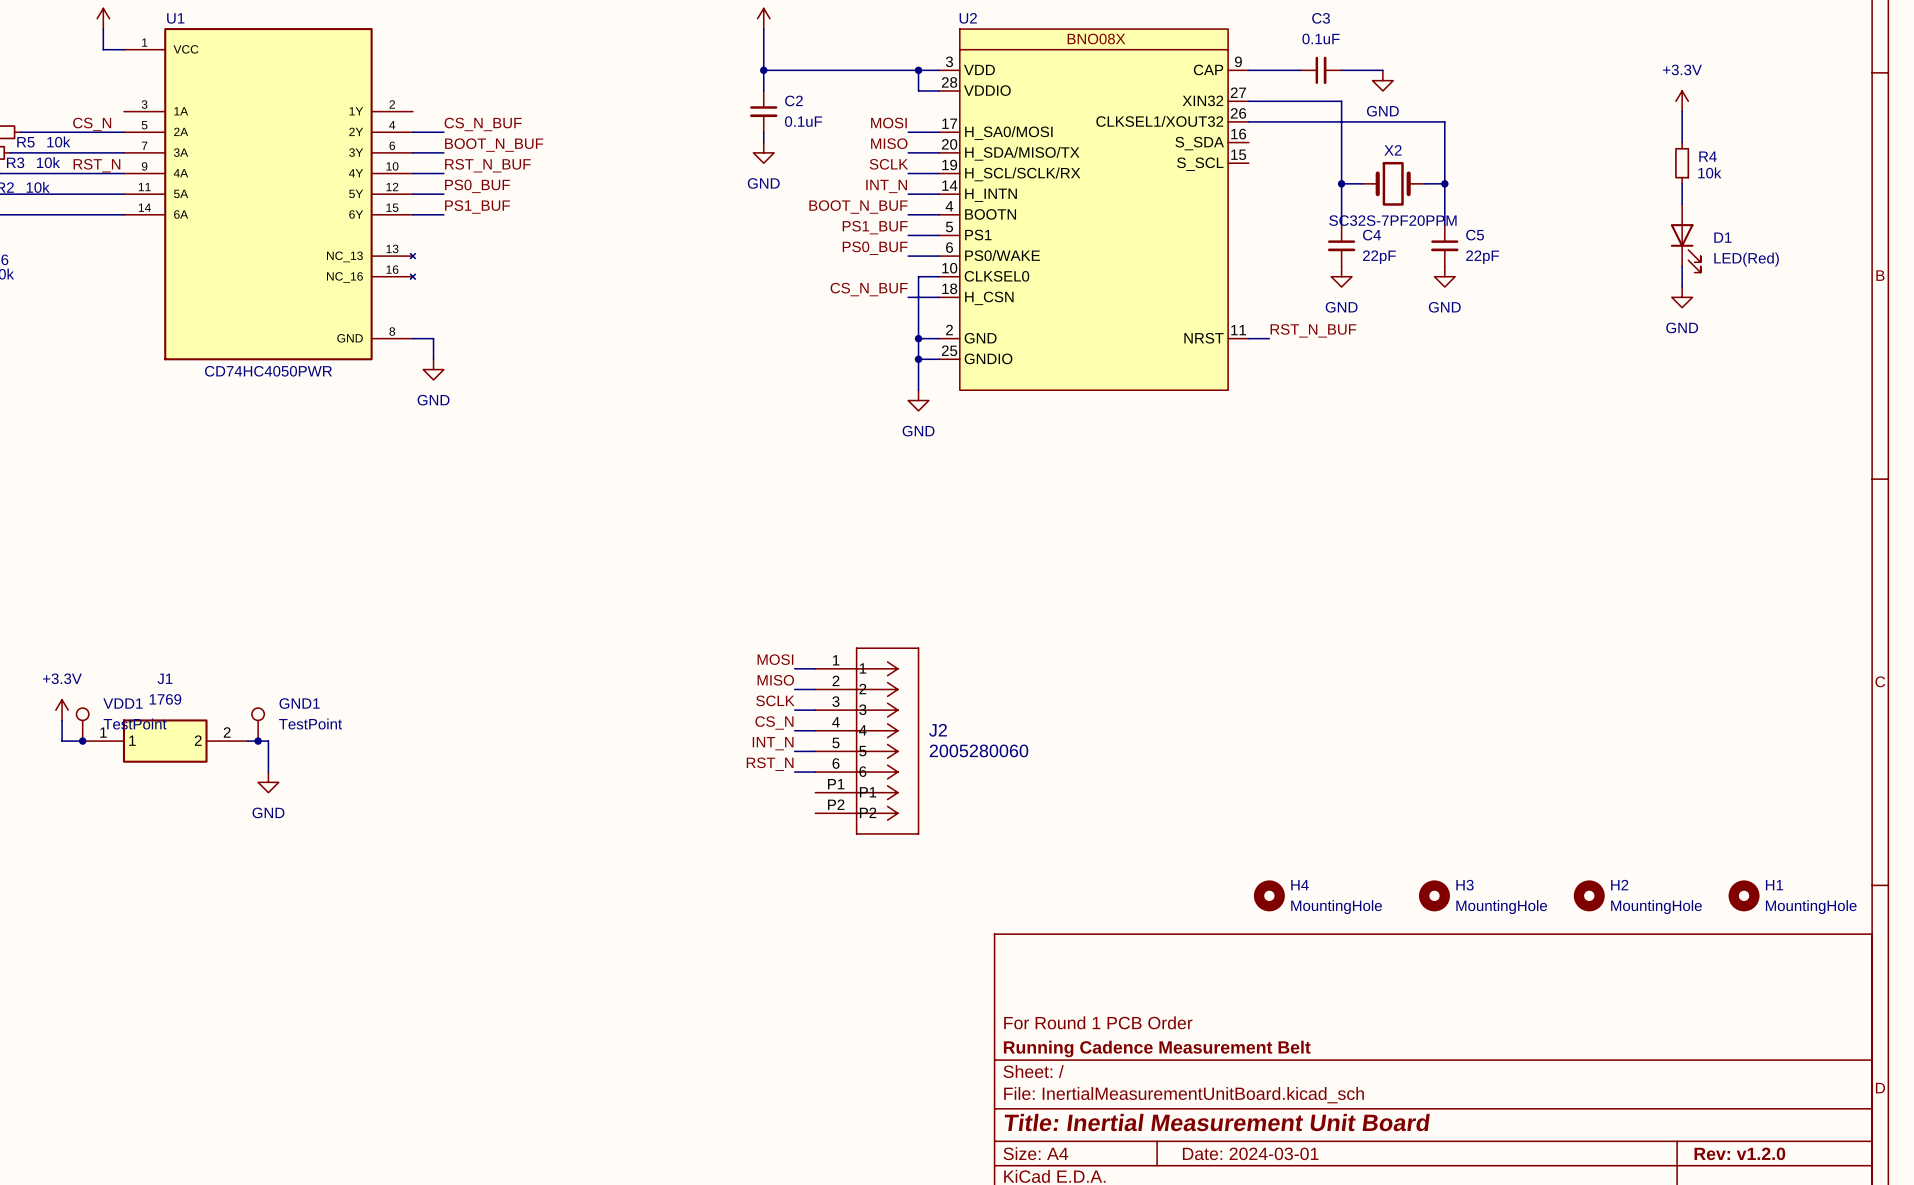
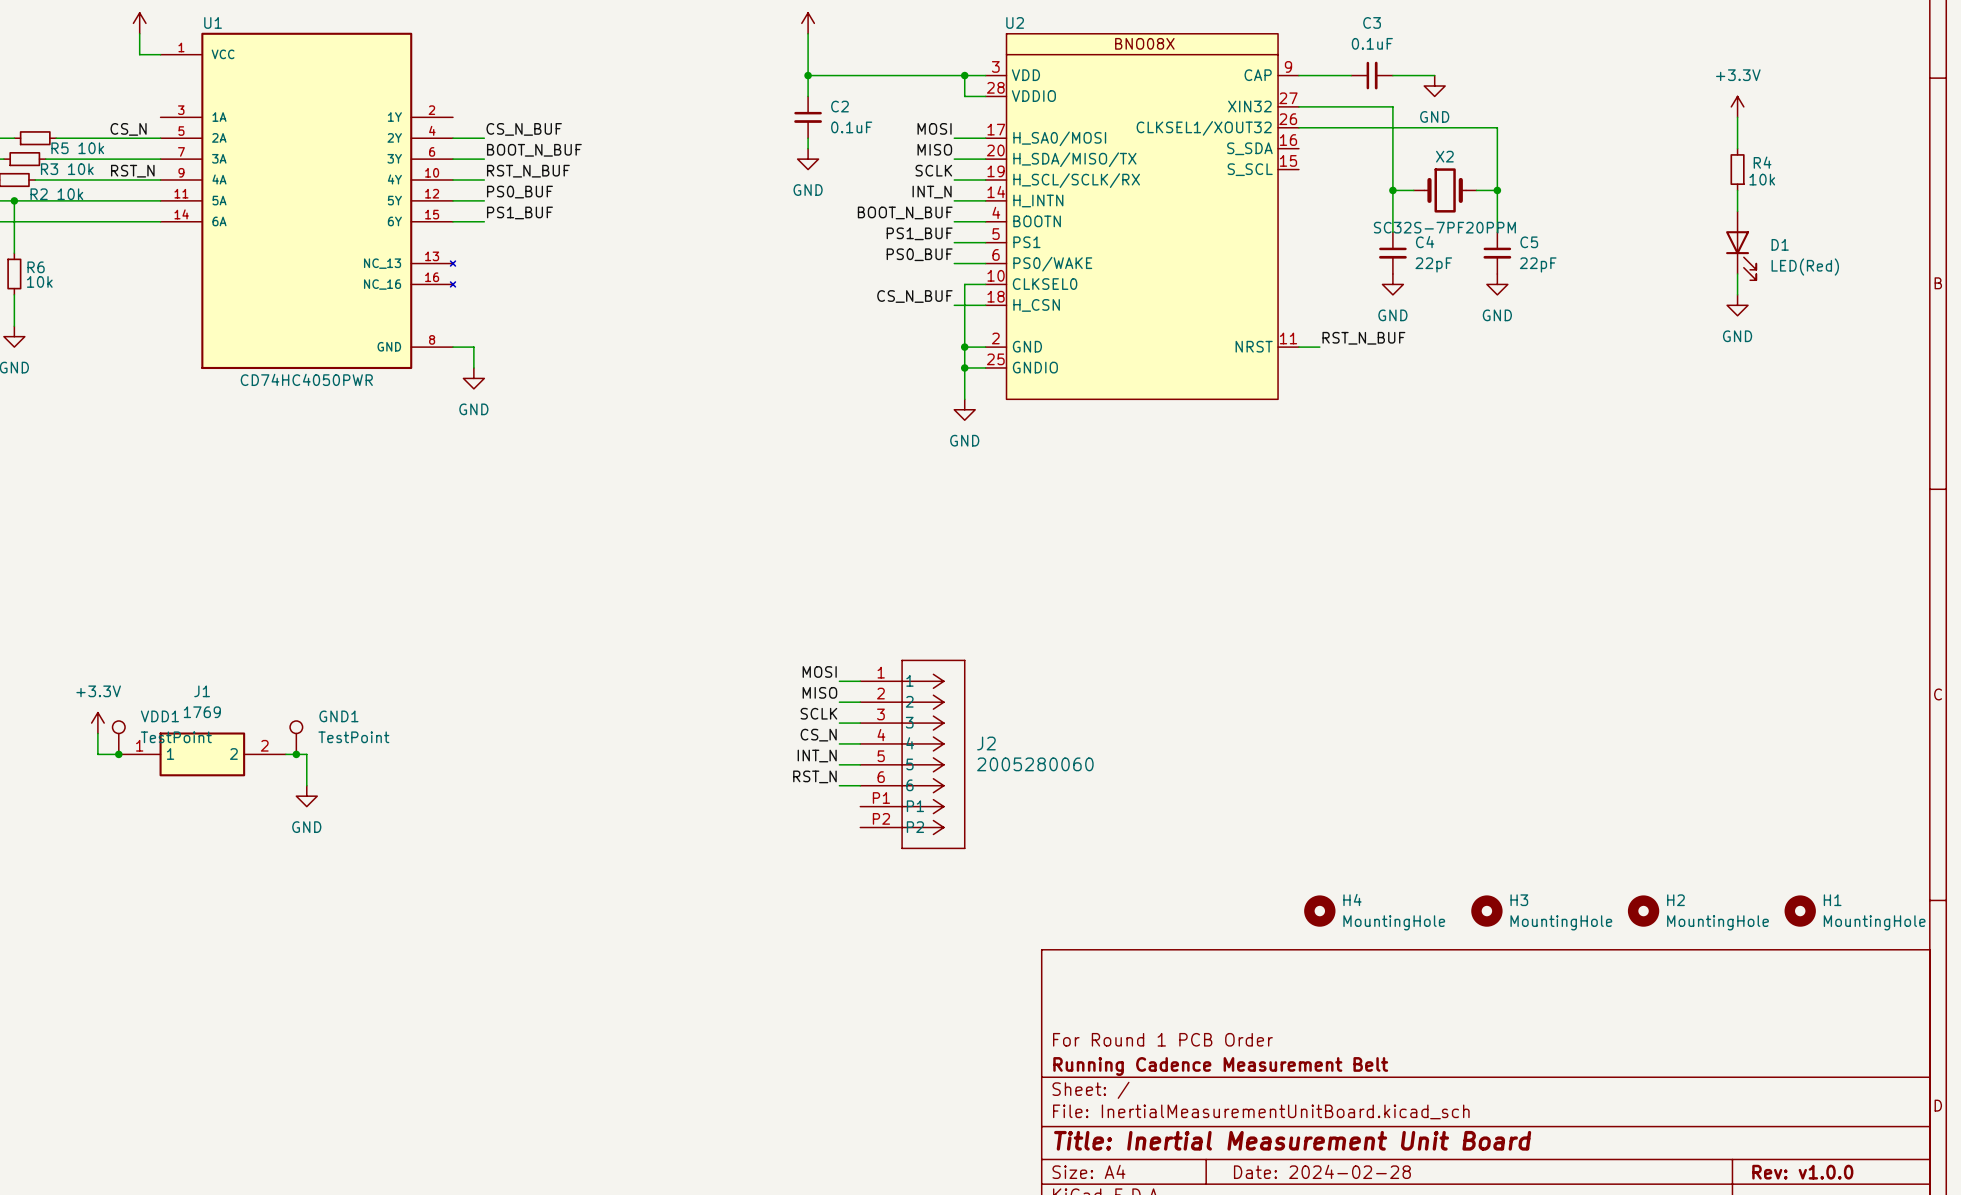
title block: Date: 2024-03-01 (1250, 1153) -> Date: 2024-02-28 (1322, 1171)
title block: Rev: v1.2.0 (1739, 1153) -> Rev: v1.0.0 (1802, 1172)

